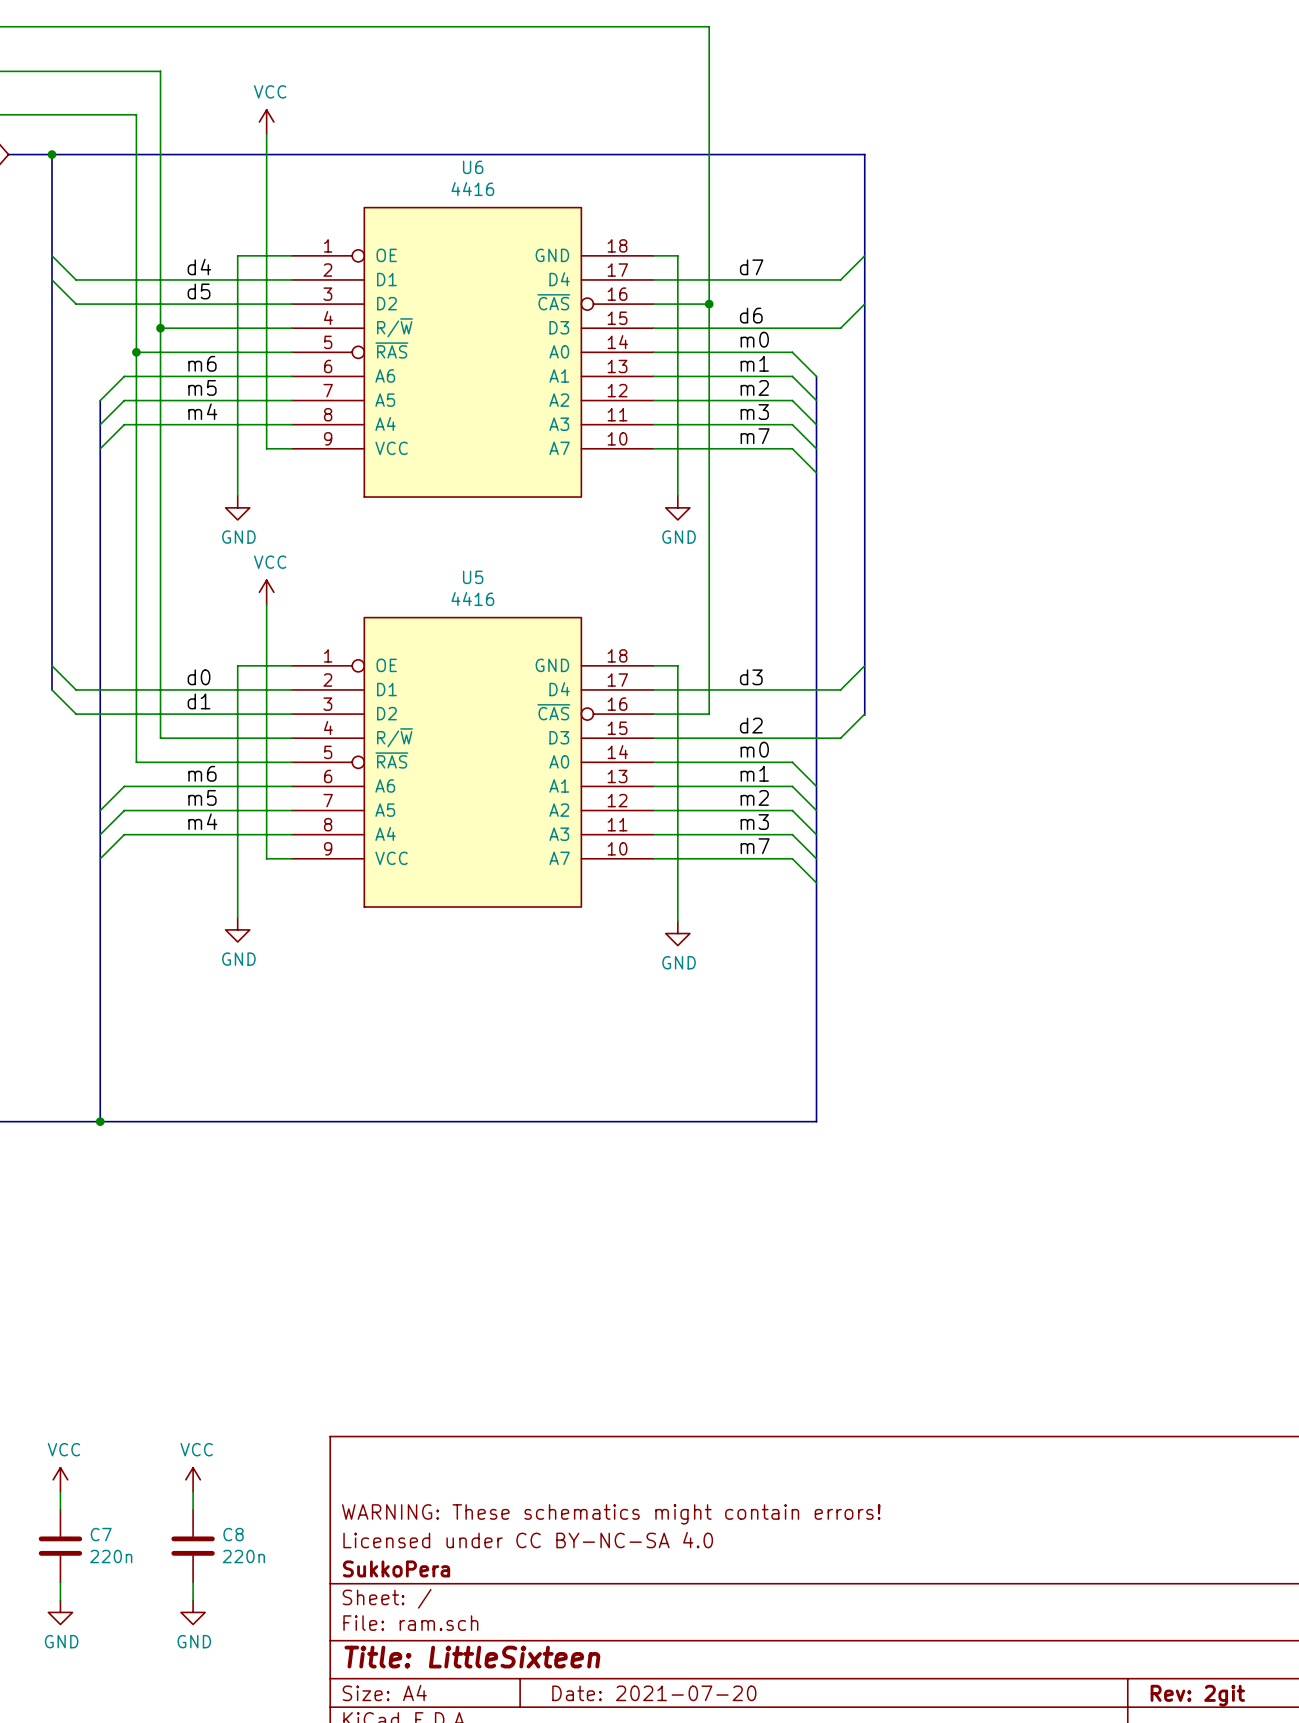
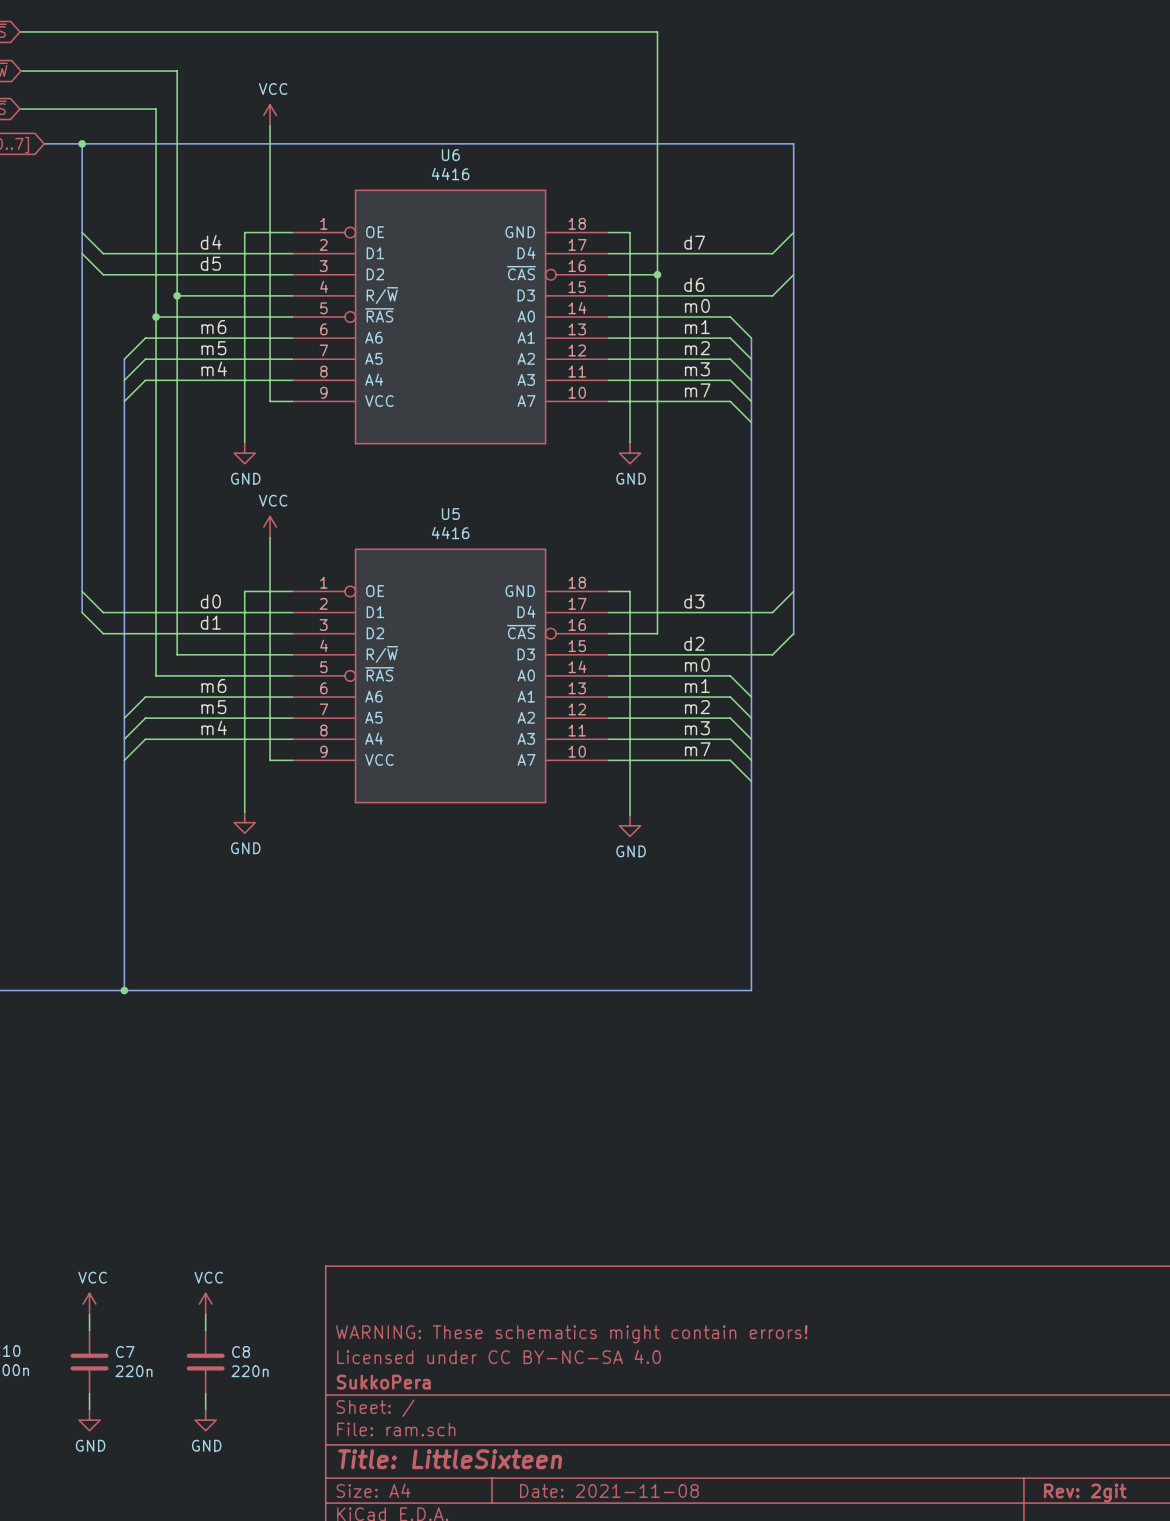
title block: Date: 2021-07-20 (654, 1693) -> Date: 2021-11-08 (609, 1490)

